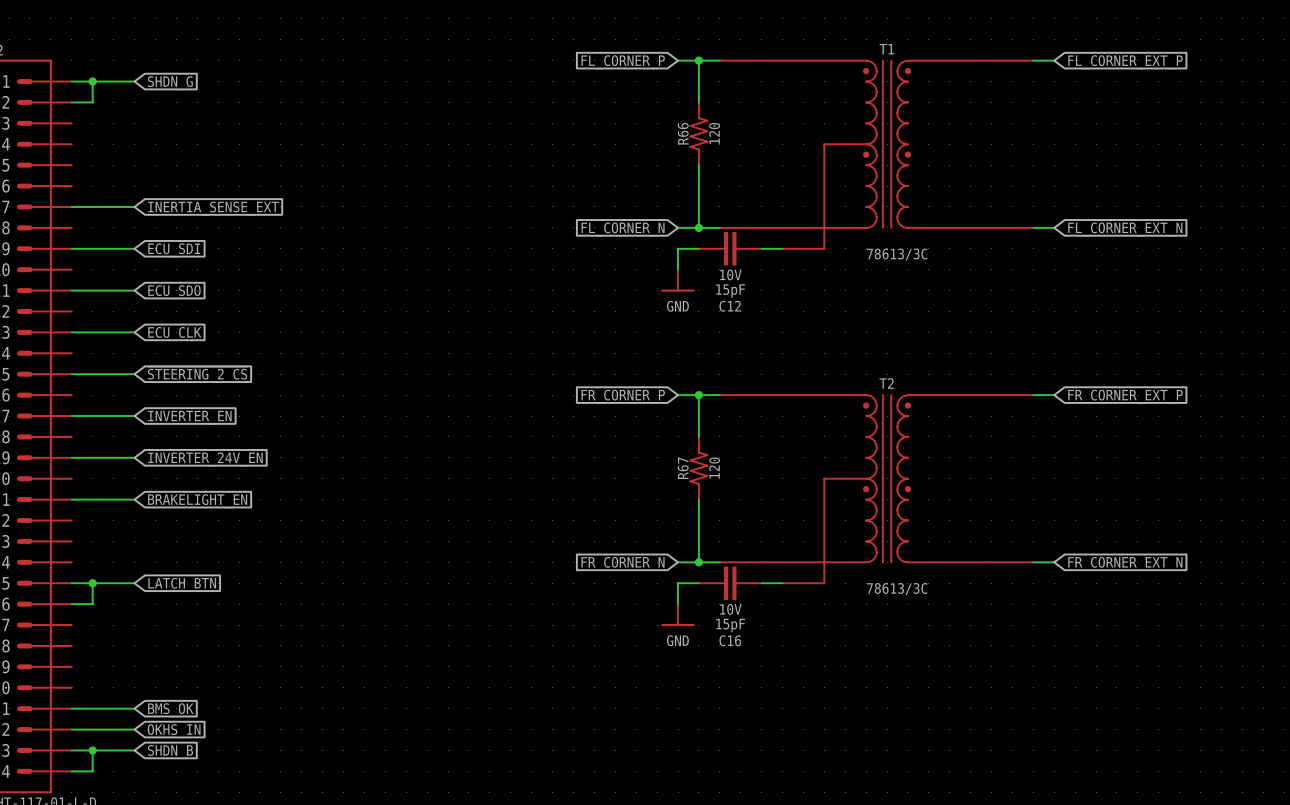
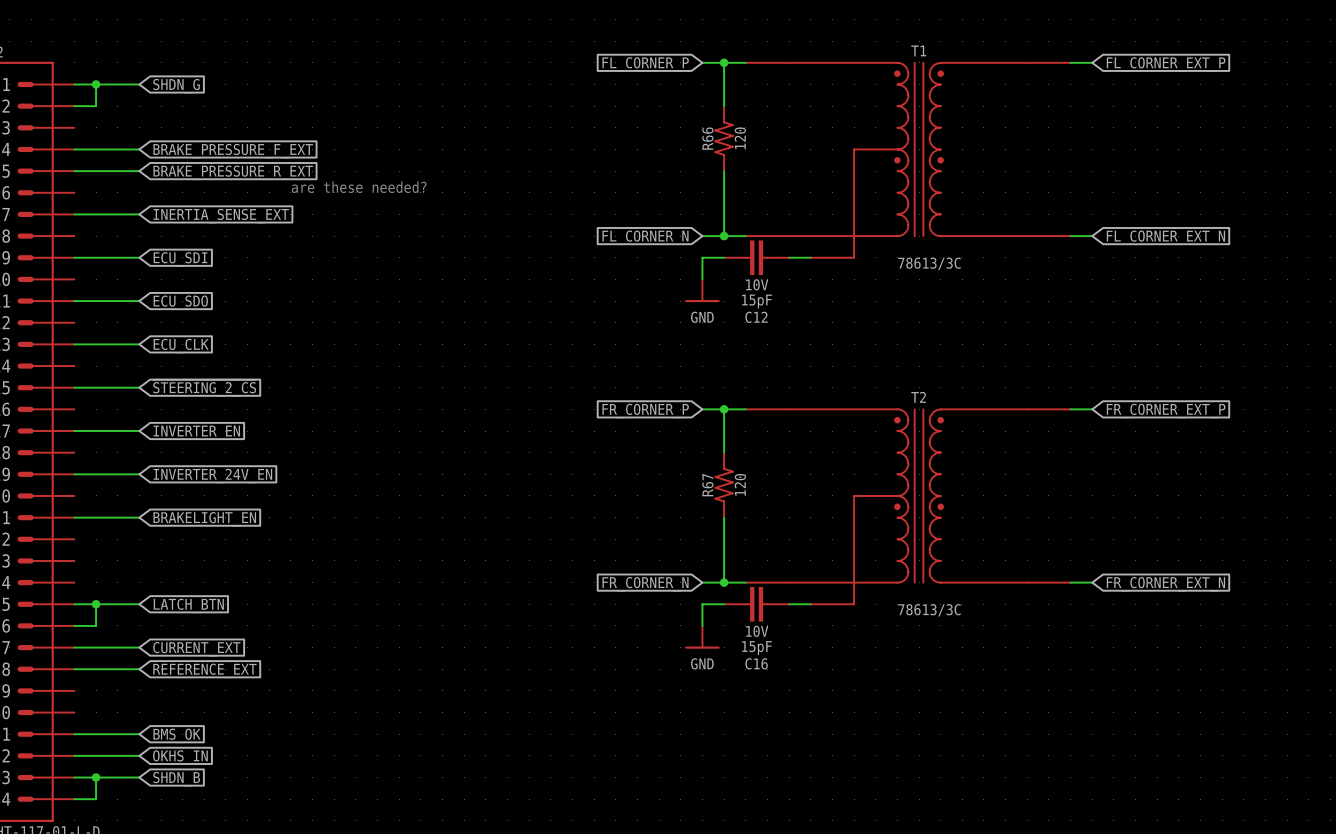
wire: none -> (74, 149) (139, 149)
global label: none -> BRAKE_PRESSURE_F_EXT (233, 151)
wire: none -> (74, 171) (139, 171)
global label: none -> BRAKE_PRESSURE_R_EXT (233, 172)
text: none -> are these needed? (359, 187)
wire: none -> (74, 647) (139, 647)
global label: none -> CURRENT_EXT (196, 649)
wire: none -> (74, 669) (139, 669)
global label: none -> REFERENCE_EXT (204, 670)

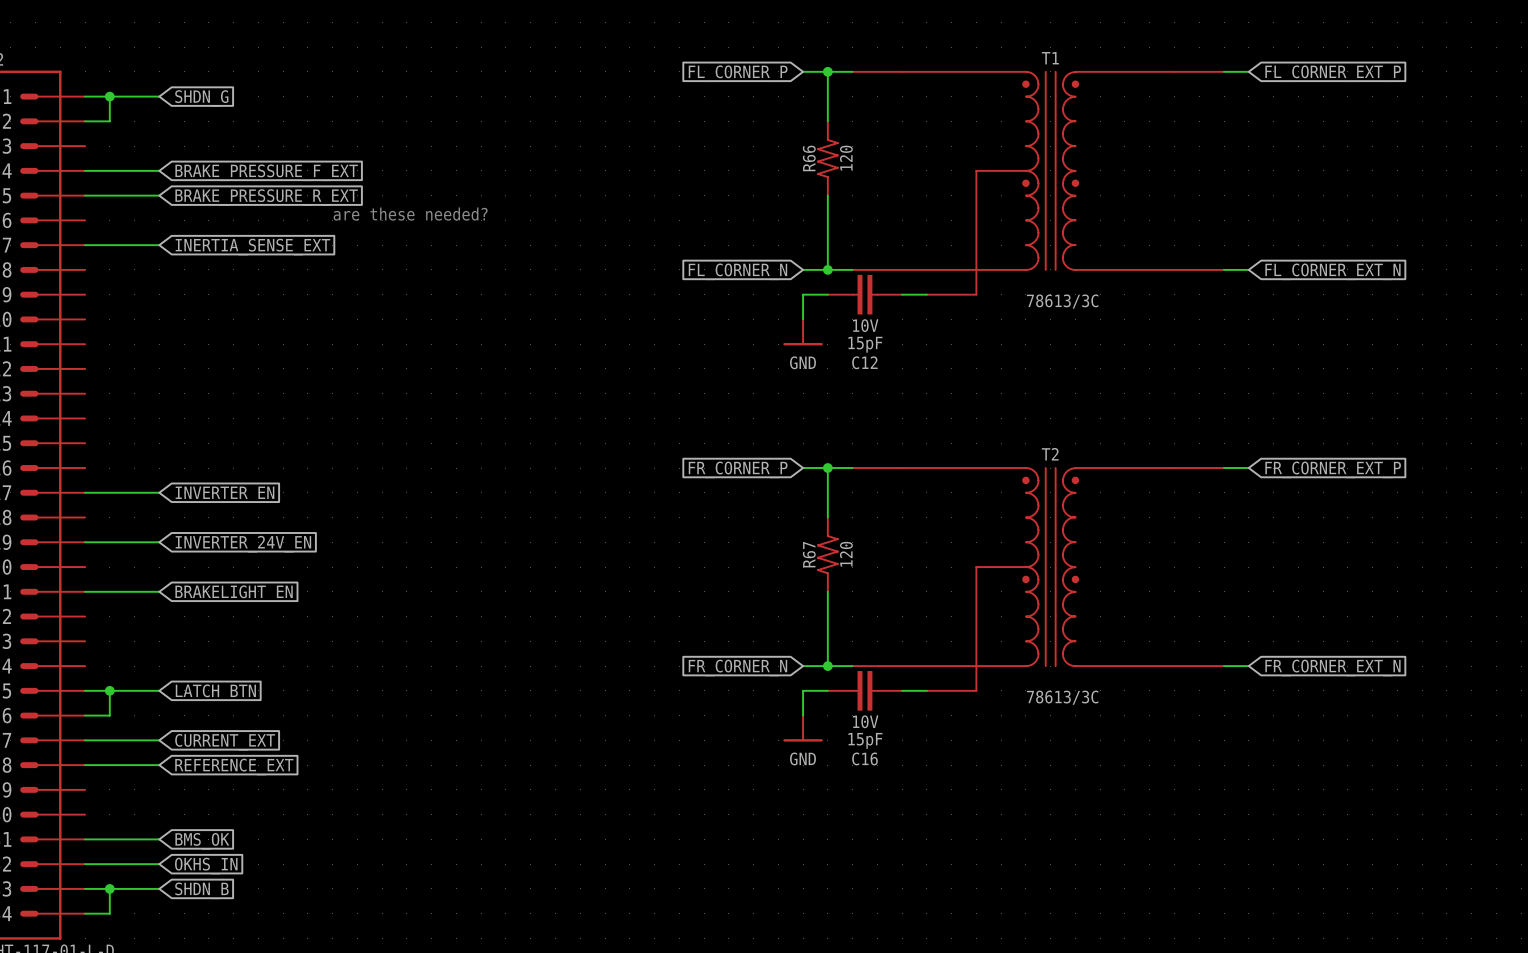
wire: (74, 257) (139, 257) -> none
global label: ECU_SDI (180, 259) -> none
wire: (74, 301) (139, 301) -> none
global label: ECU_SDO (180, 302) -> none
wire: (74, 344) (139, 344) -> none
global label: ECU_CLK (181, 346) -> none
wire: (74, 387) (139, 387) -> none
global label: ~{STEERING_2_CS} (204, 388) -> none

